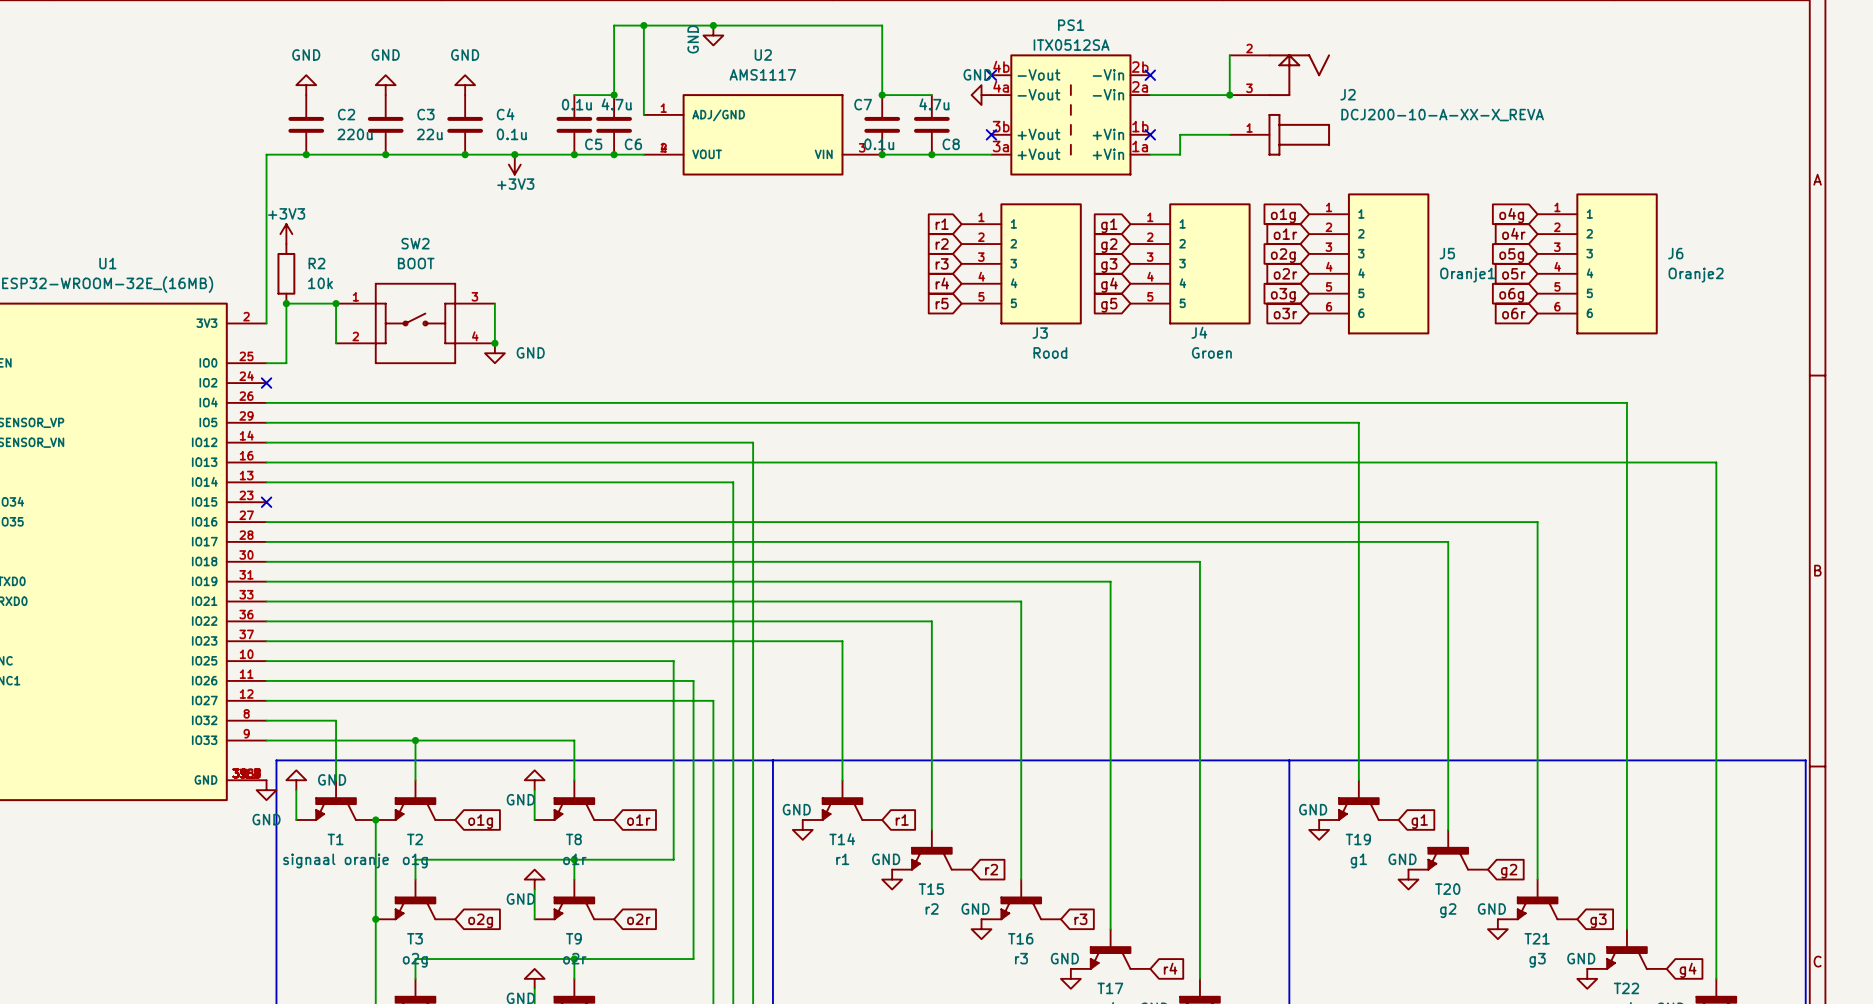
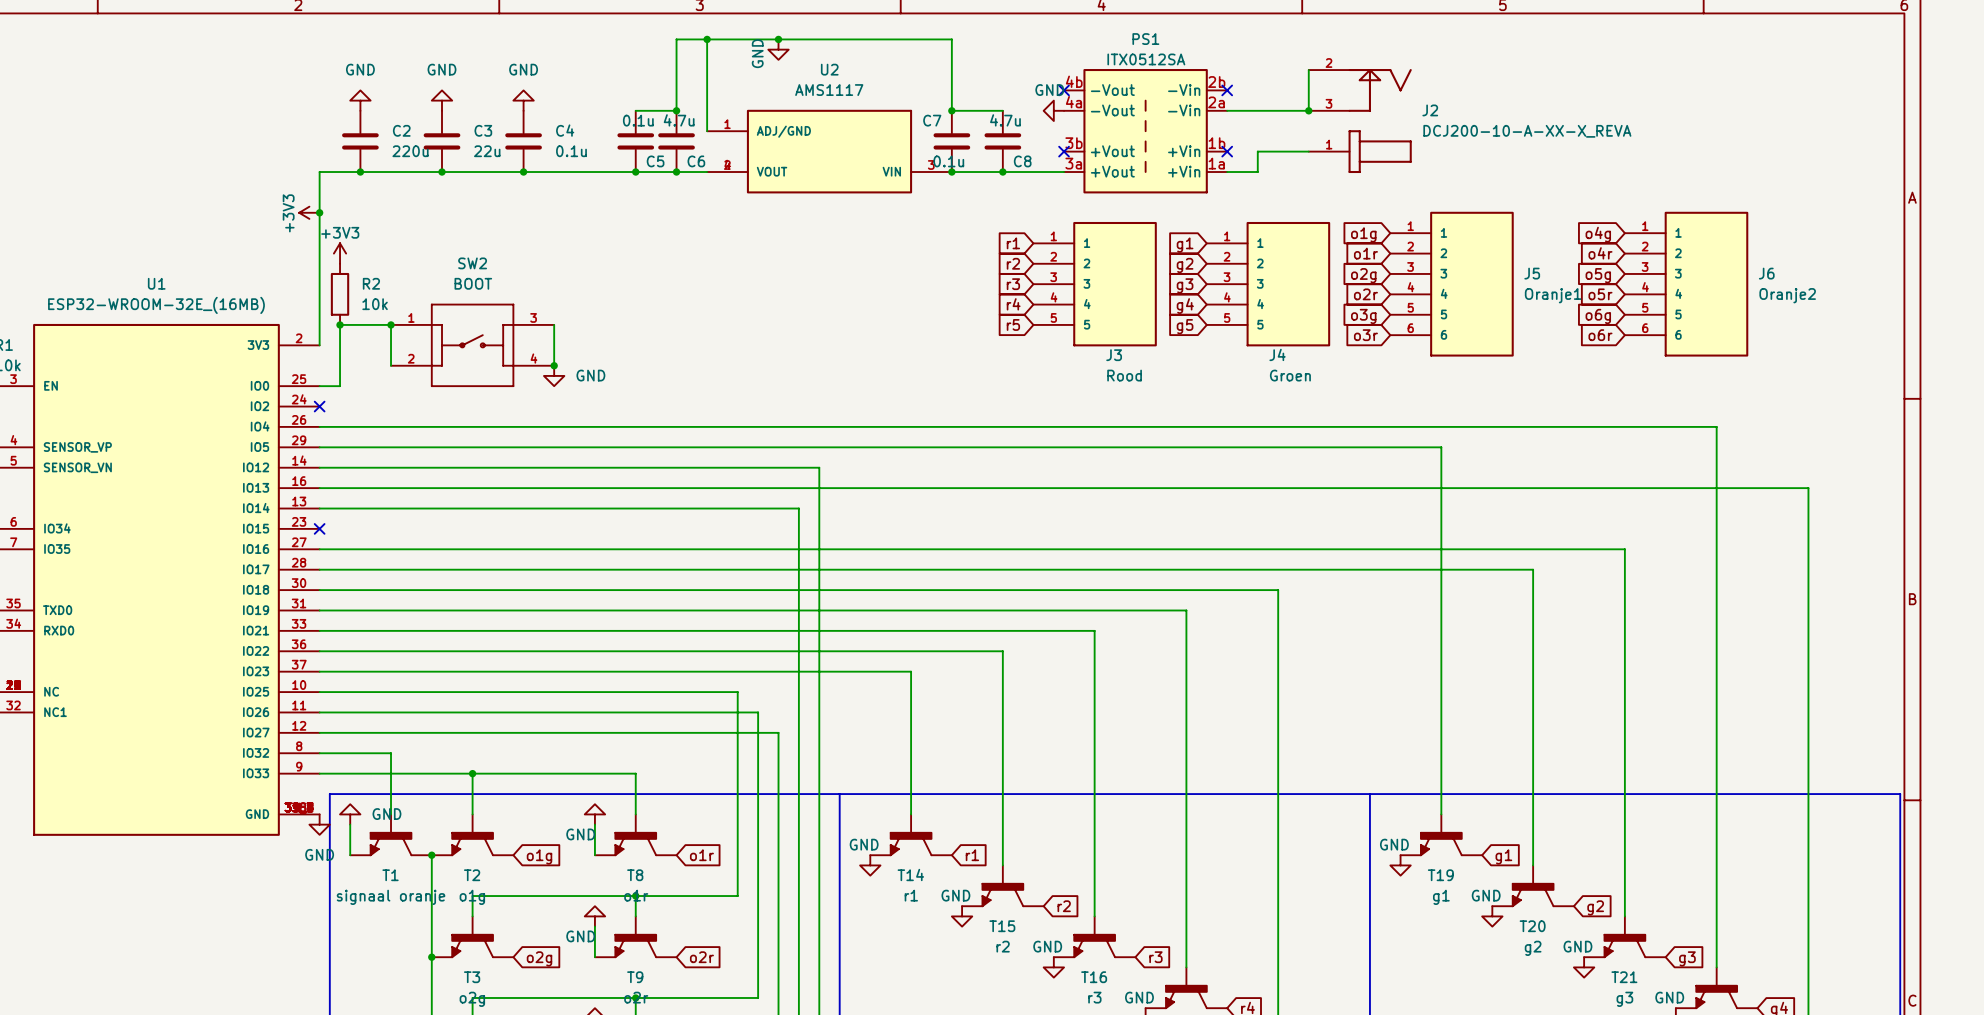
junction: (514, 154) -> none
power symbol: +3V3 (514, 164) -> none
power symbol: none -> +3V3 (309, 212)
junction: none -> (319, 212)

